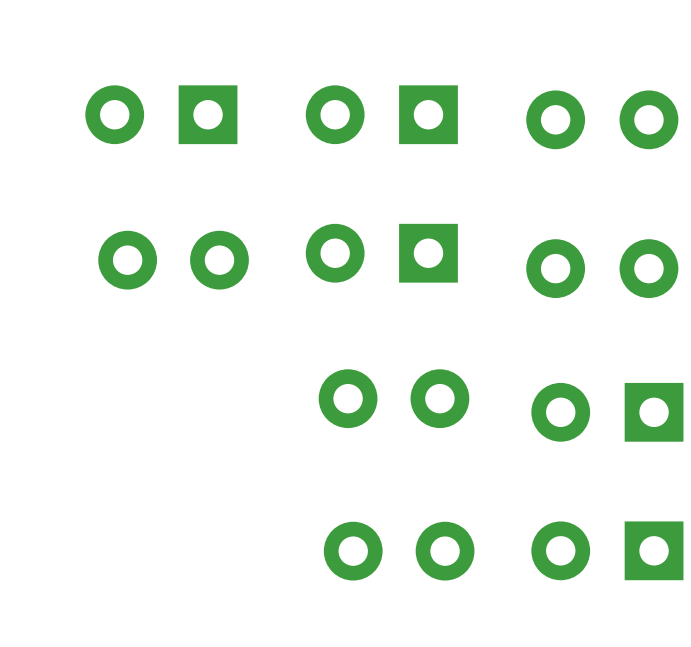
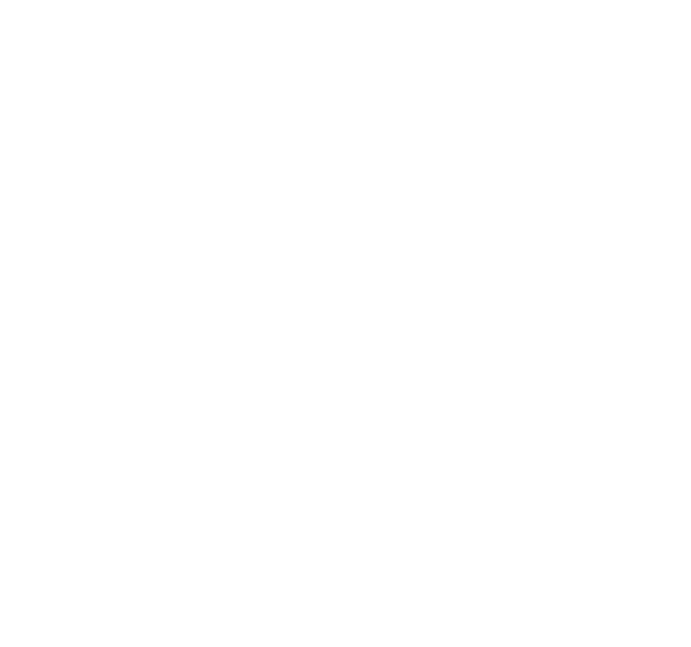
part: (161, 114) -> none
part: (381, 114) -> none
part: (602, 119) -> none
part: (381, 253) -> none
part: (173, 260) -> none
part: (602, 268) -> none
part: (394, 398) -> none
part: (607, 412) -> none
part: (607, 550) -> none
part: (399, 551) -> none

